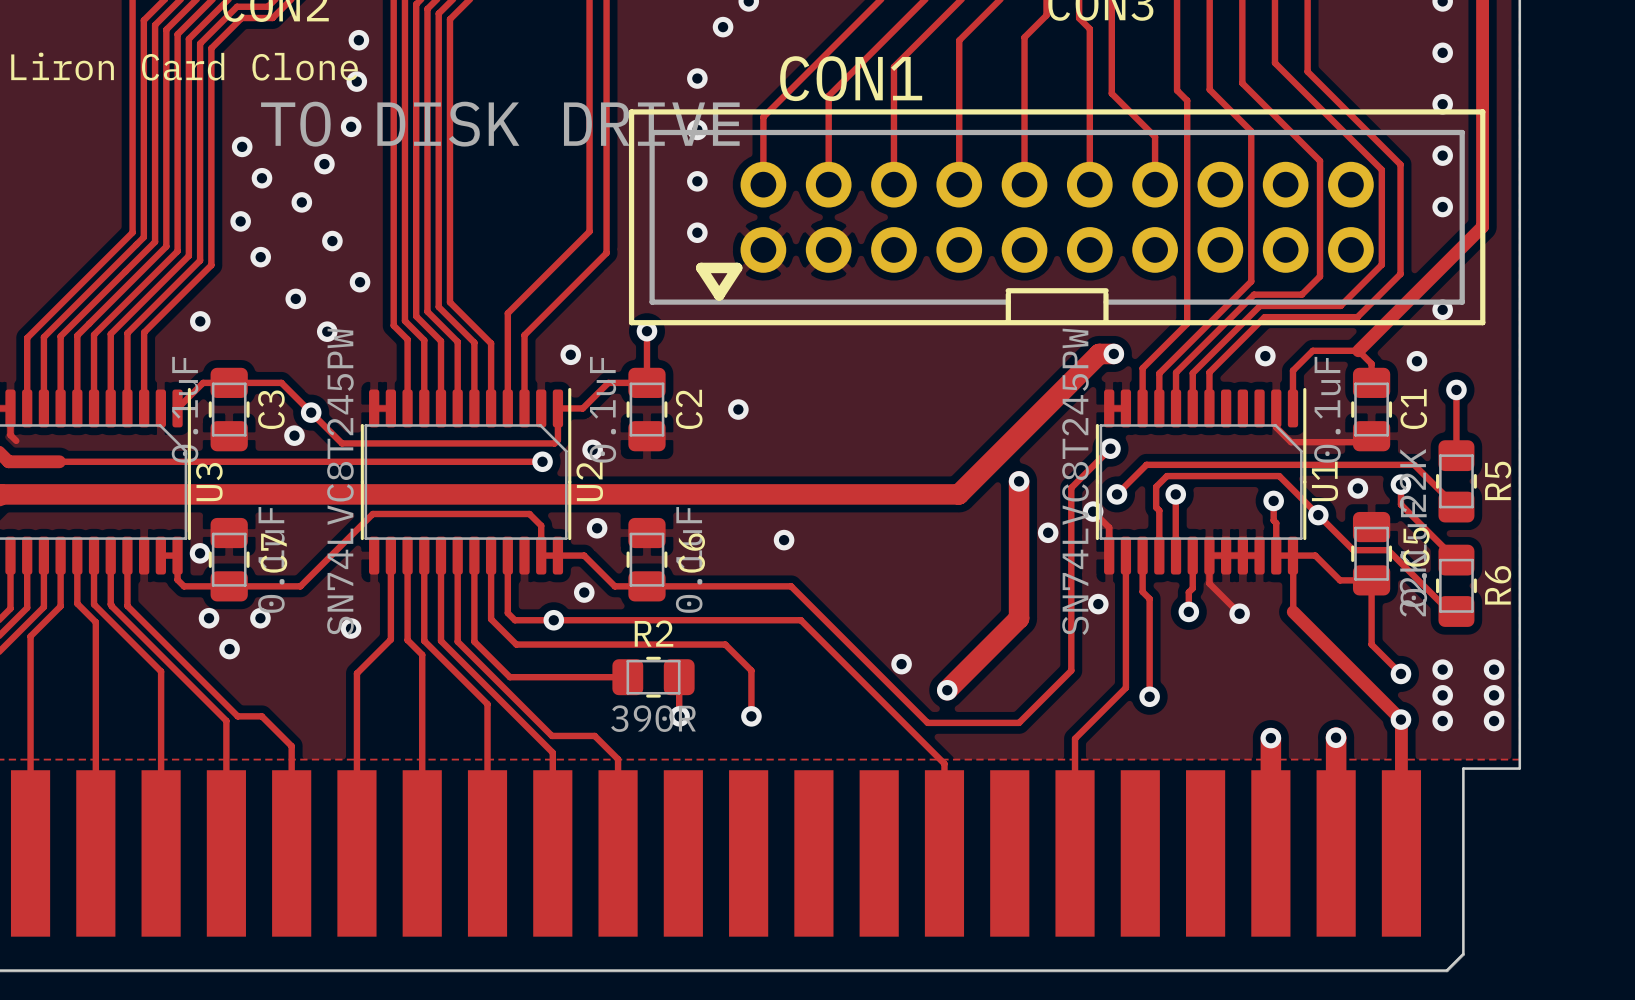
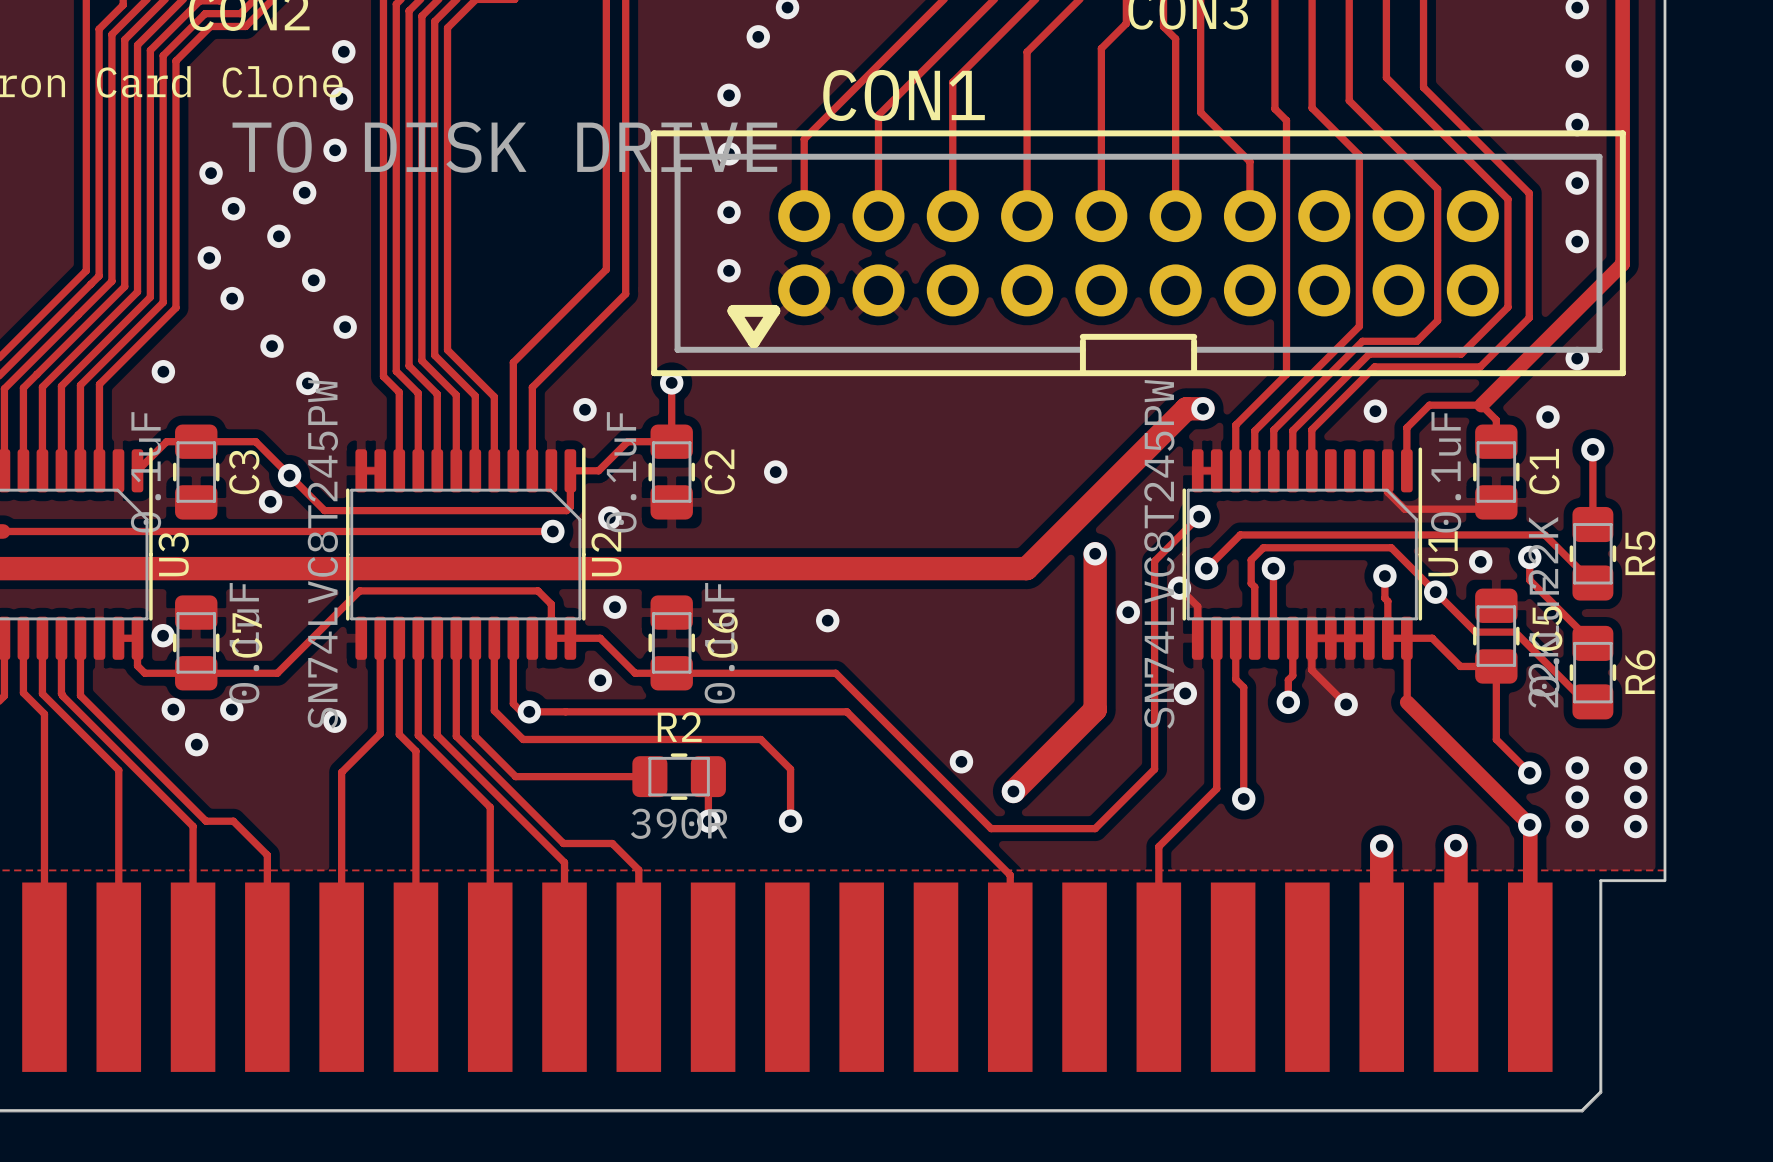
via position: (553, 620) -> (529, 711)

